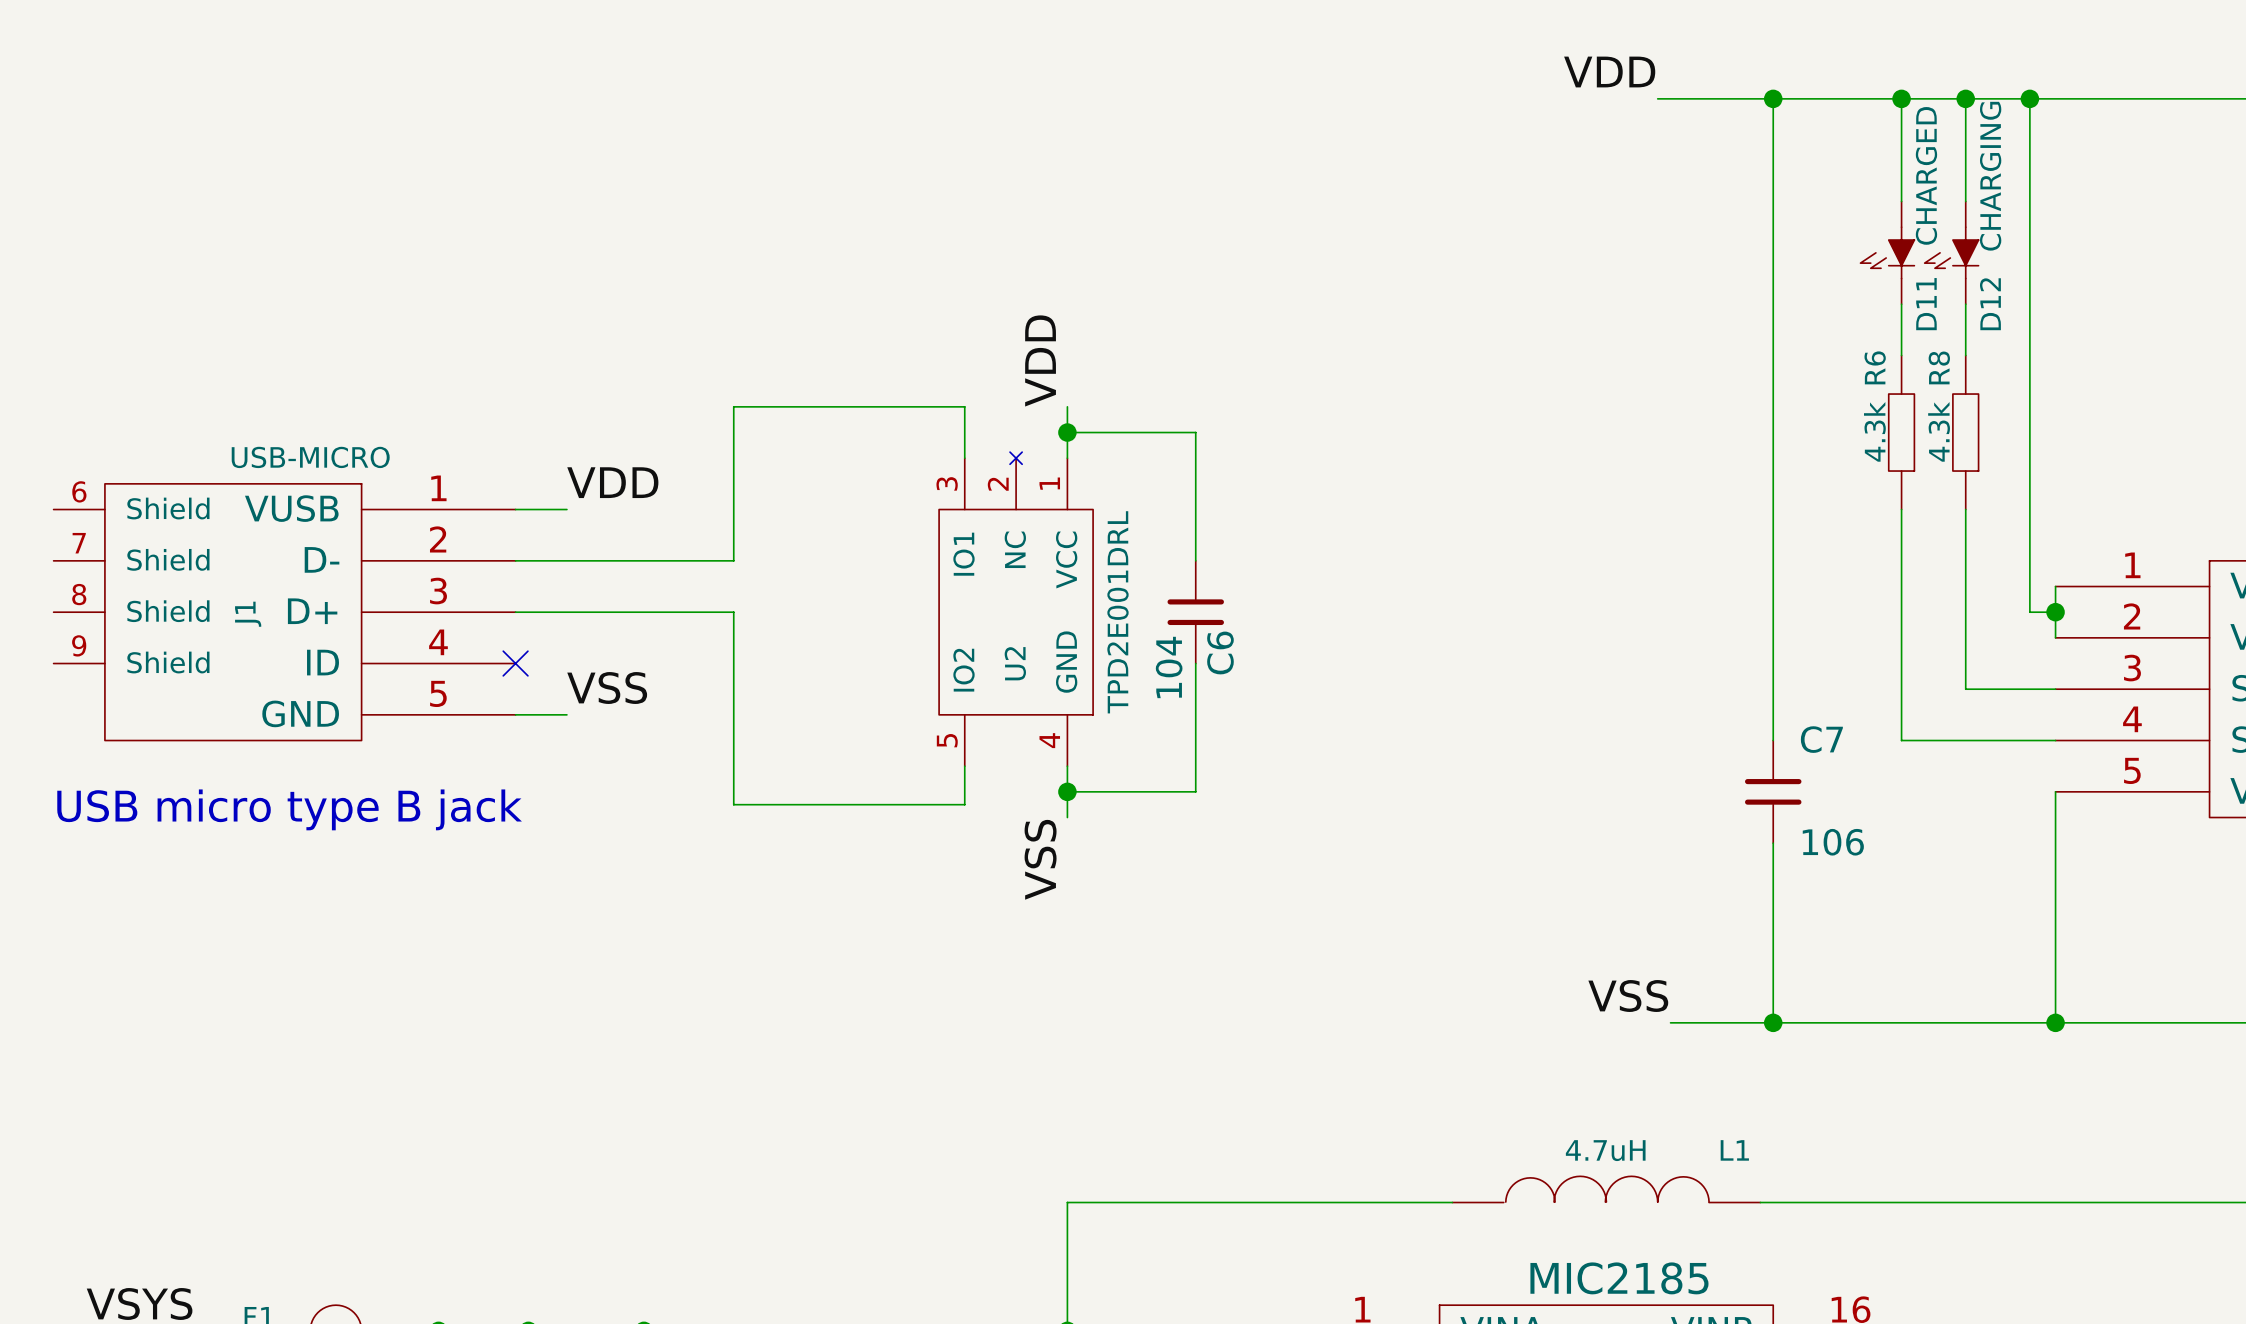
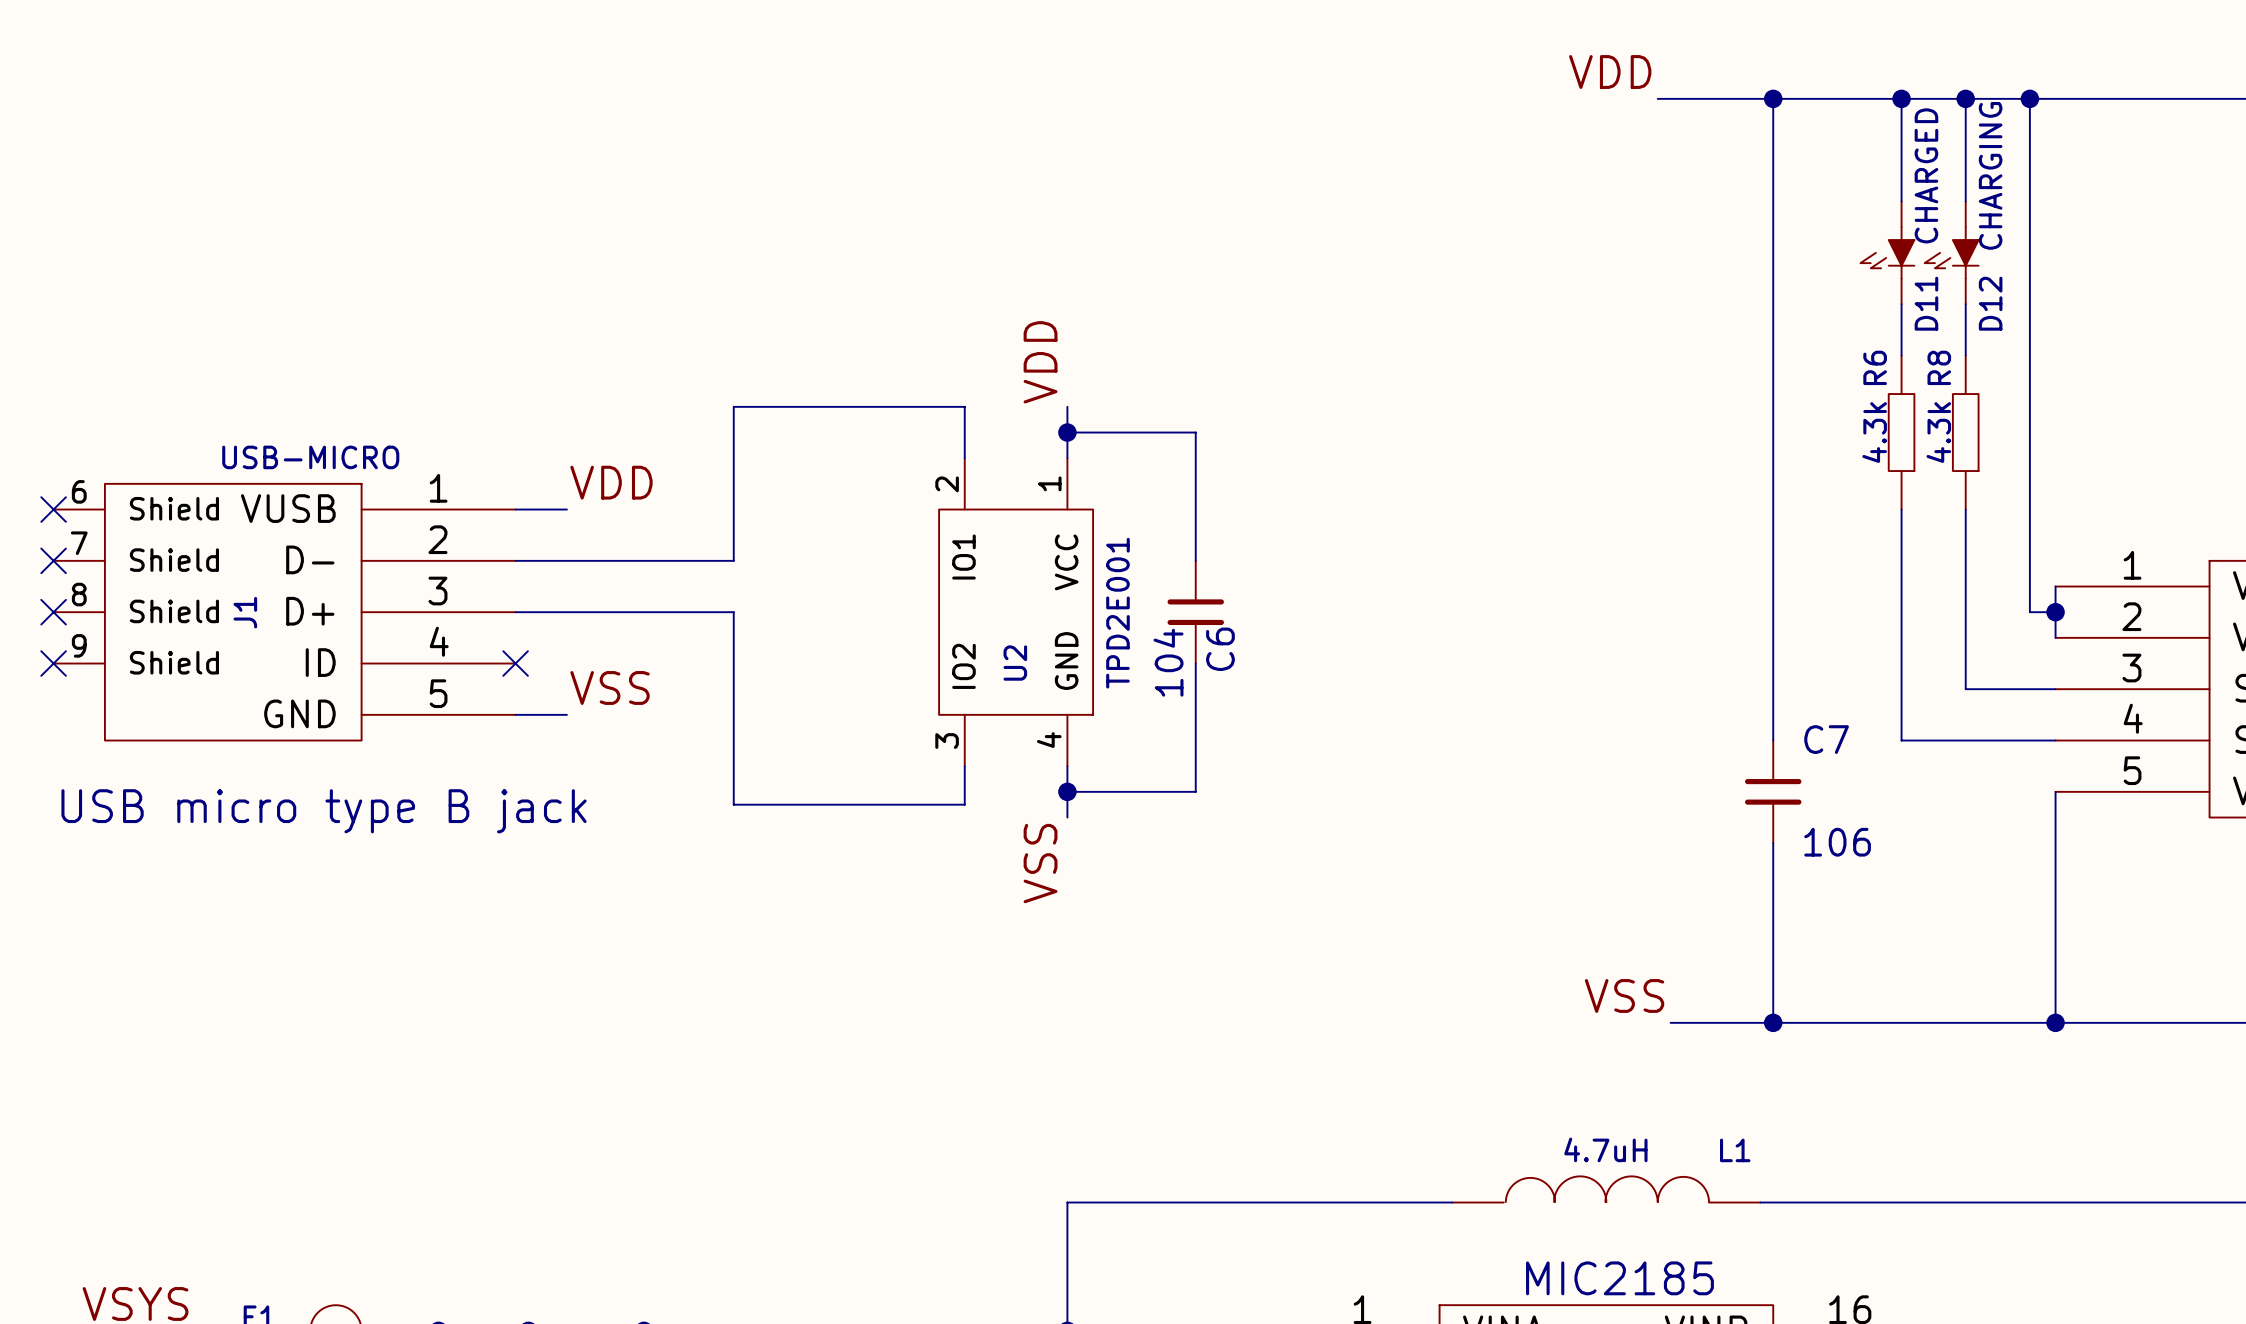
U2 symbol: [939, 452, 1094, 767] -> [939, 458, 1094, 767]
no-connect mark: none -> (53, 509)
no-connect mark: none -> (53, 560)
no-connect mark: none -> (53, 612)
U2 value: TPD2E001DRL (1117, 612) -> TPD2E001 (1117, 613)
no-connect mark: none -> (53, 663)

